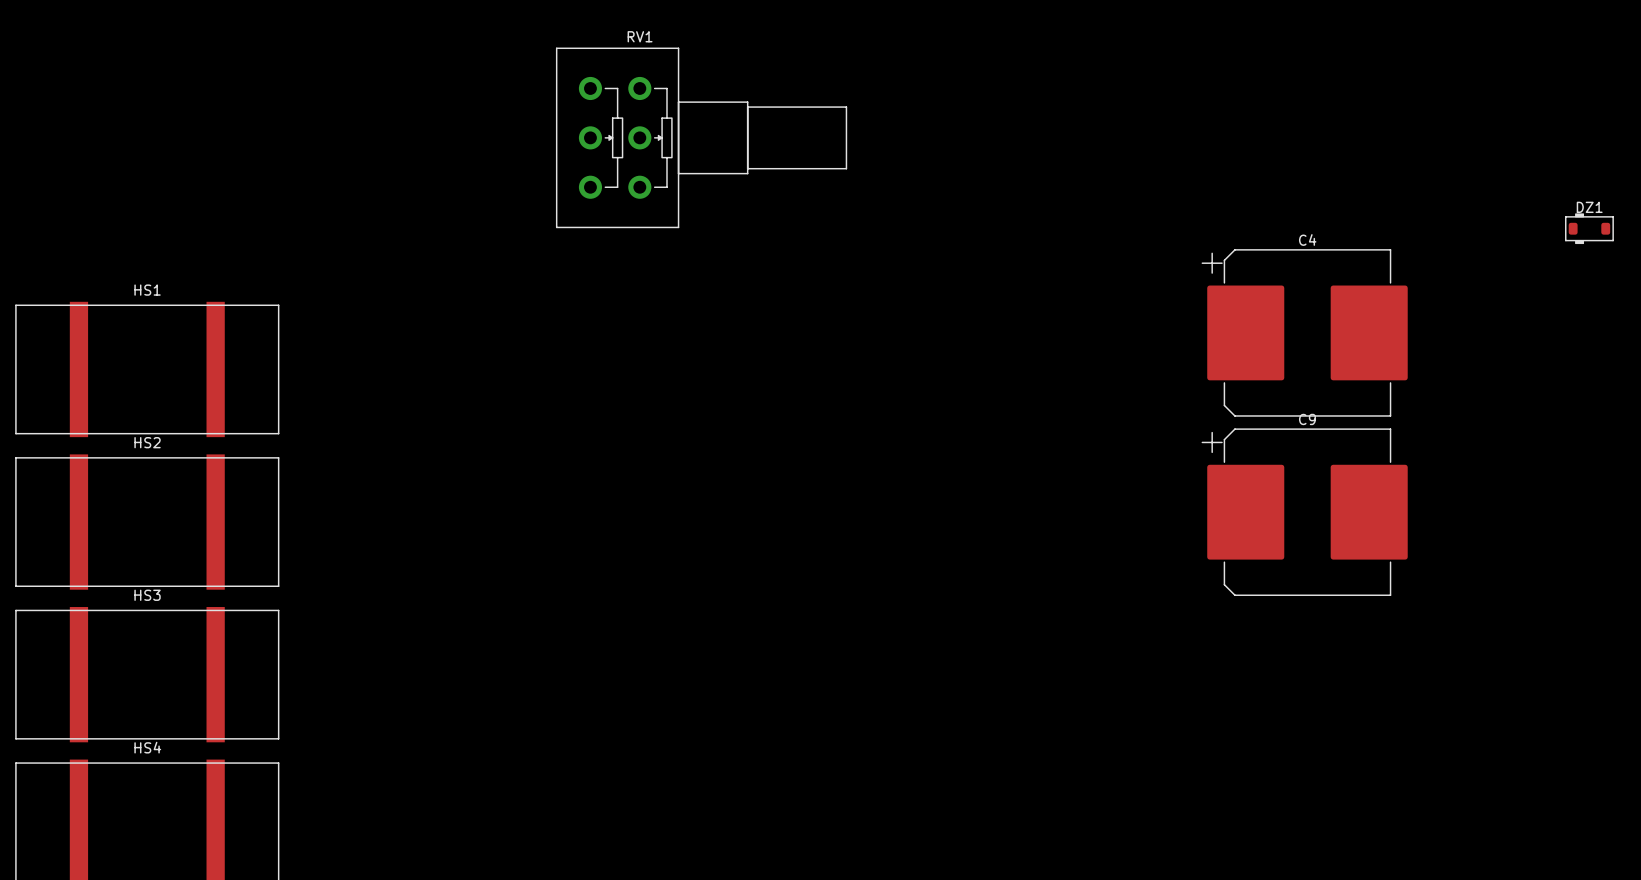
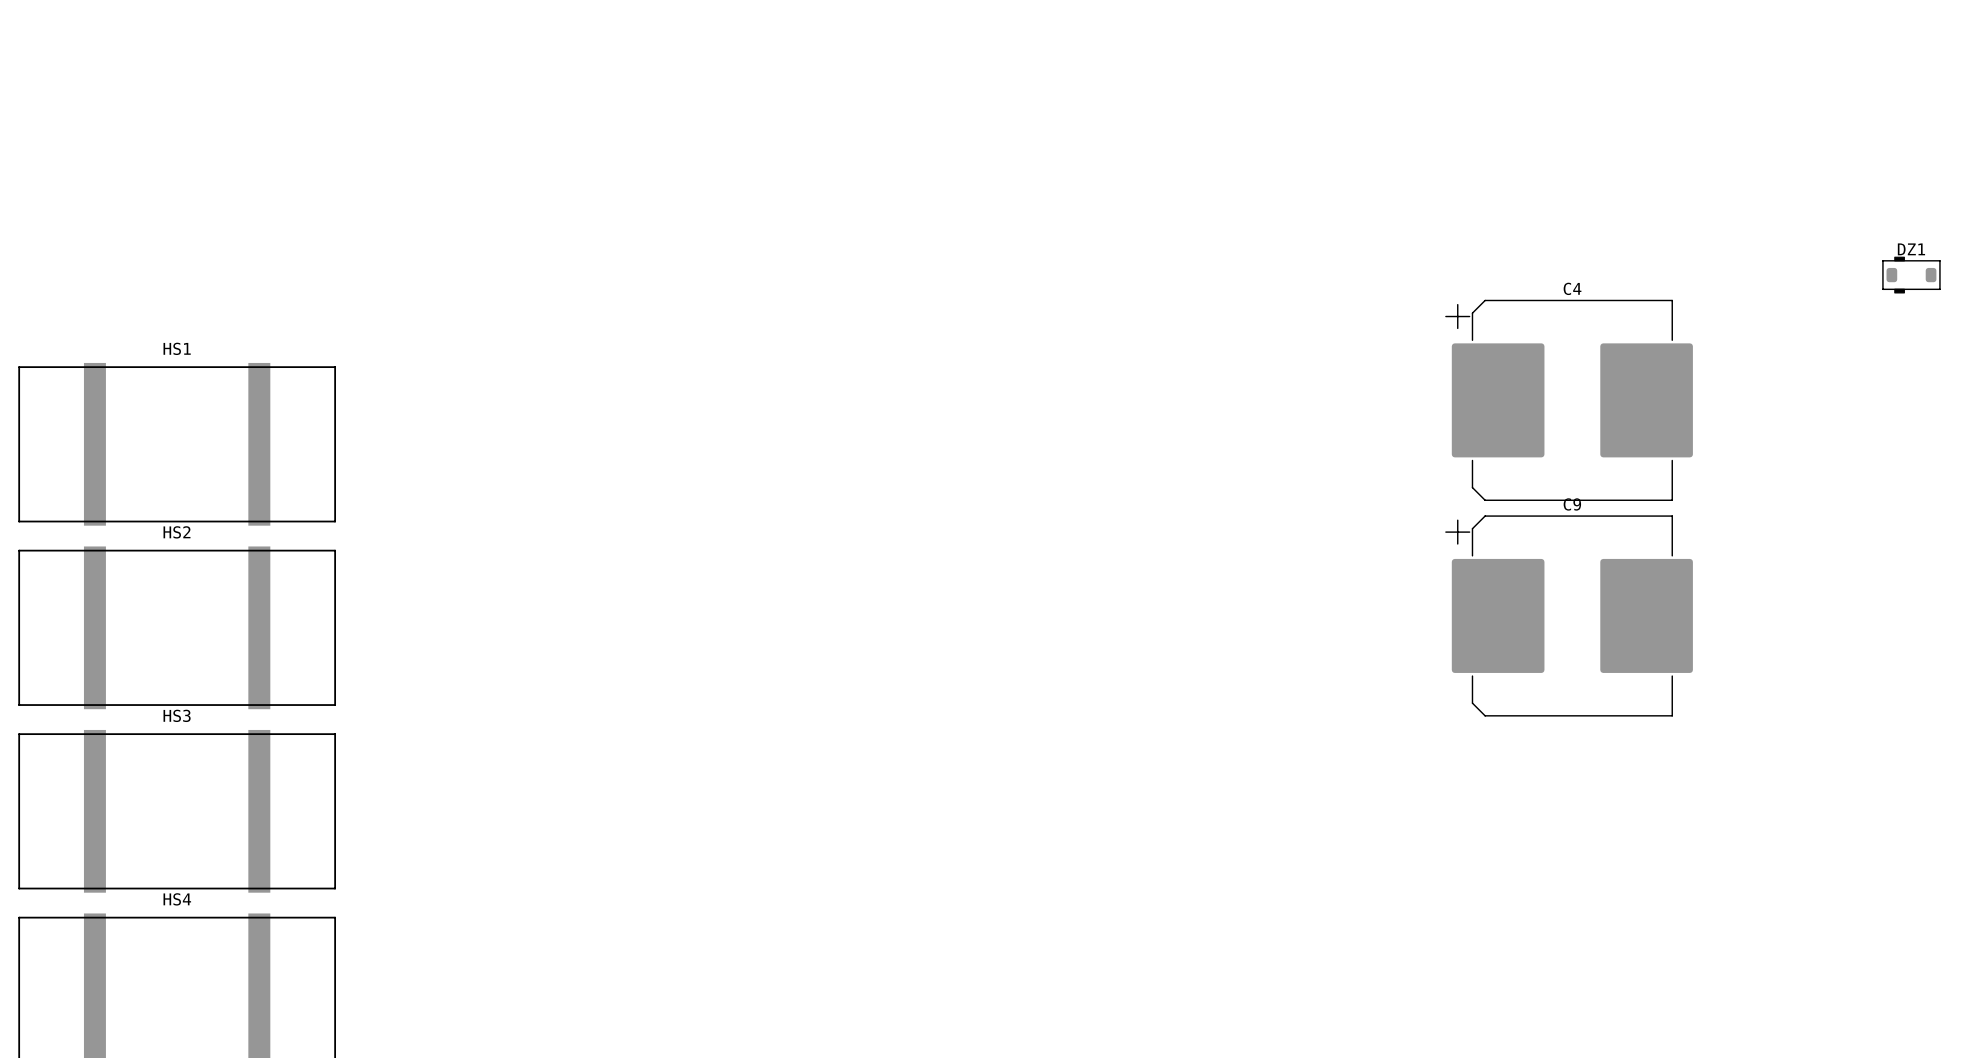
RV1: (701, 137) -> none

